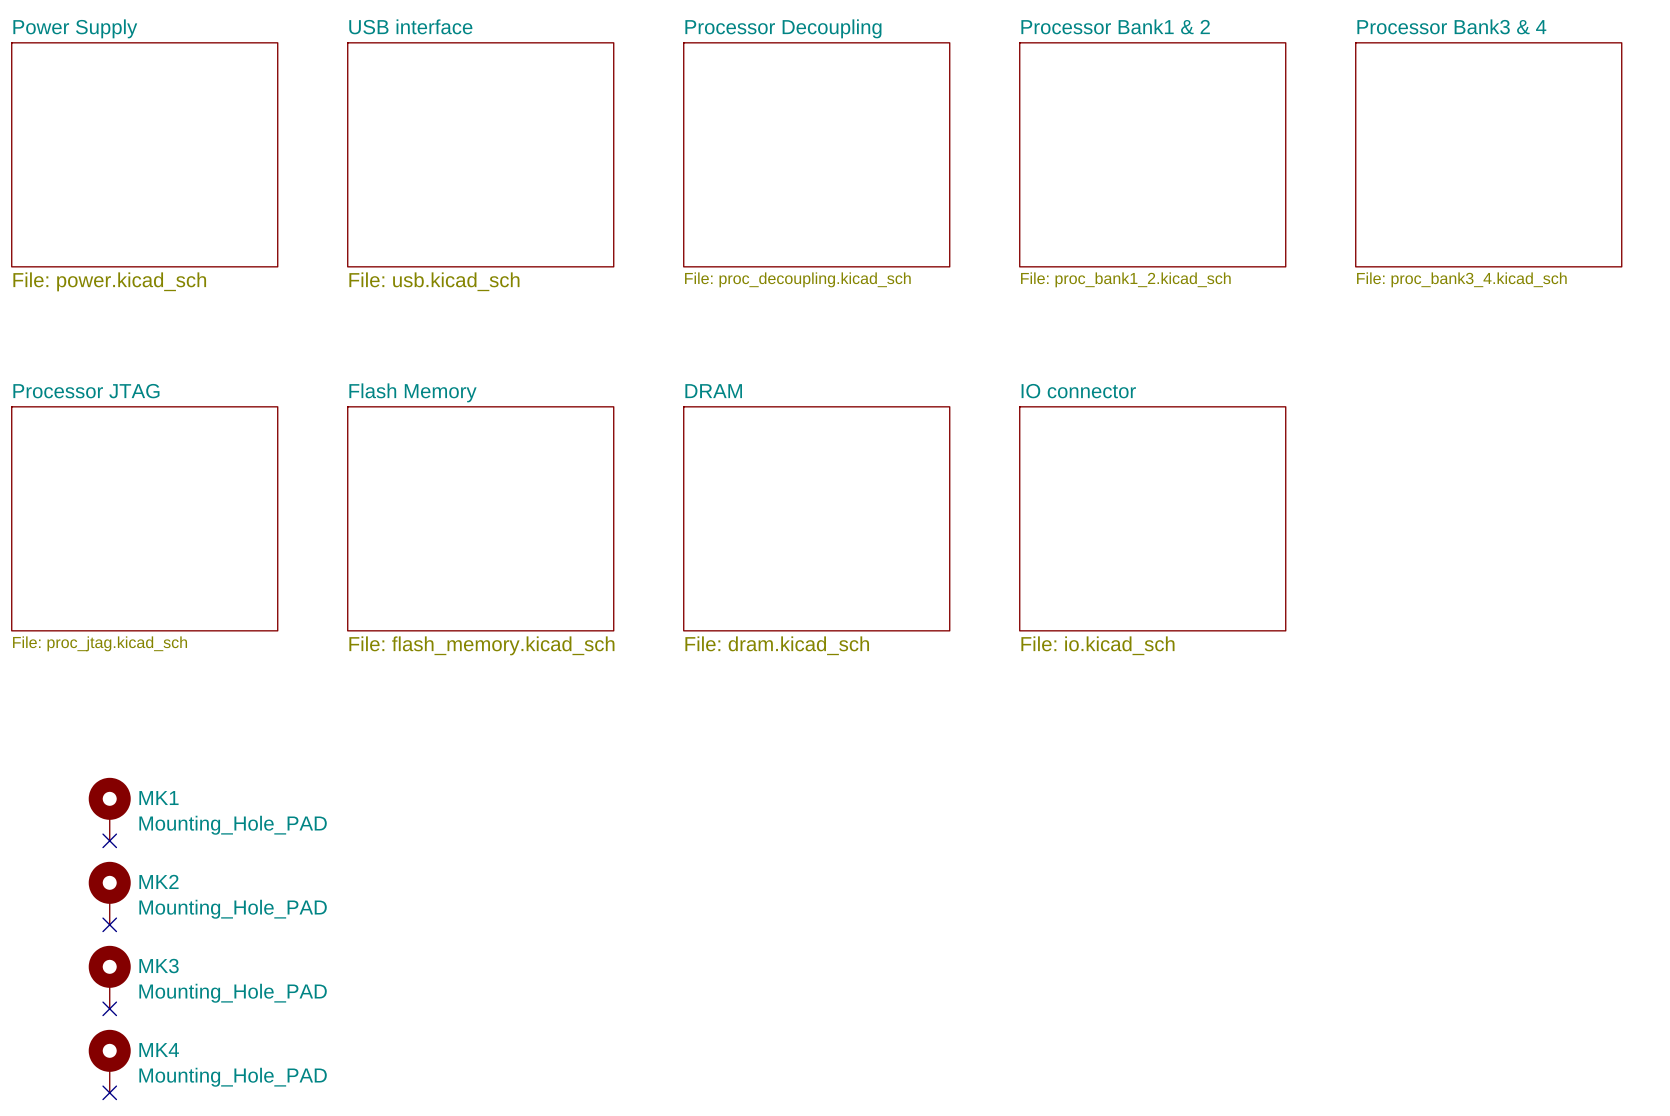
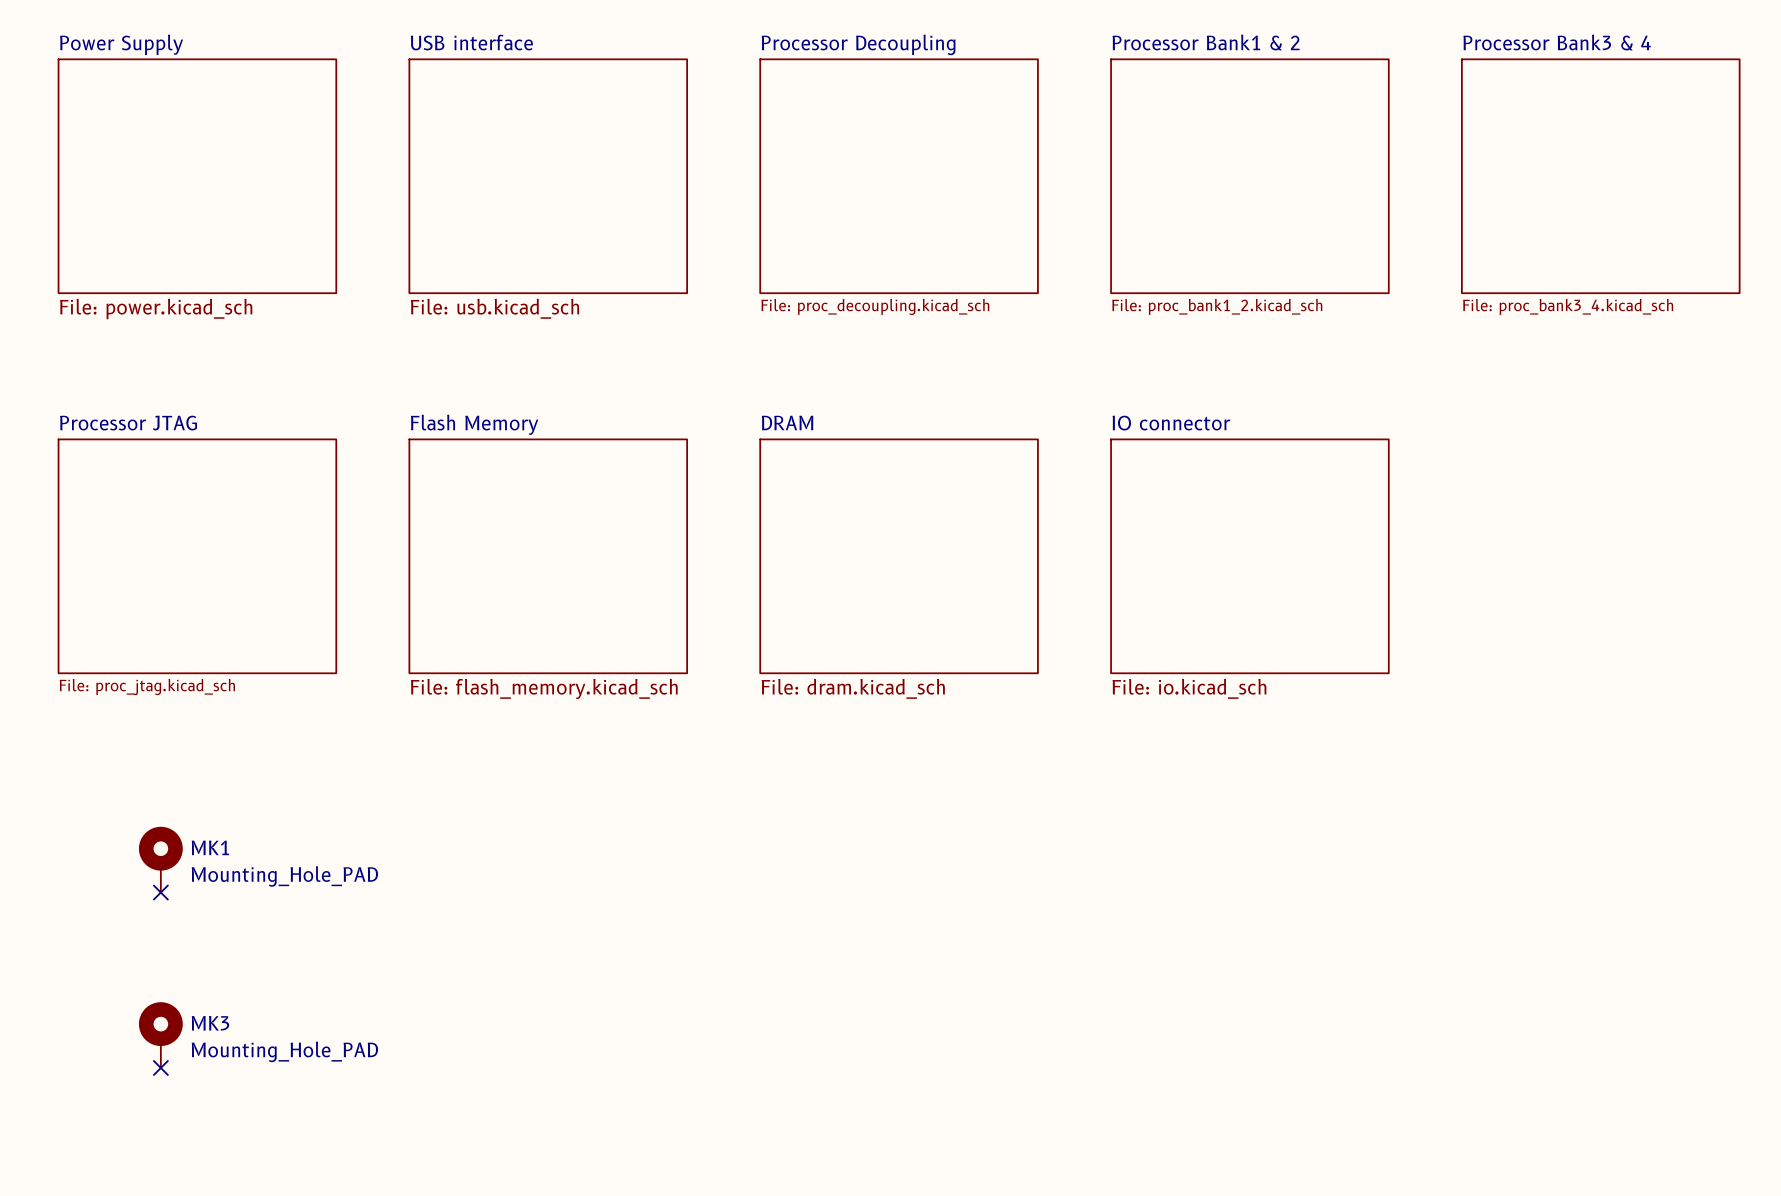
MK2: Mounting_Hole_PAD (109, 893) -> none
no-connect mark: (109, 924) -> none
MK4: Mounting_Hole_PAD (109, 1061) -> none
no-connect mark: (109, 1092) -> none

